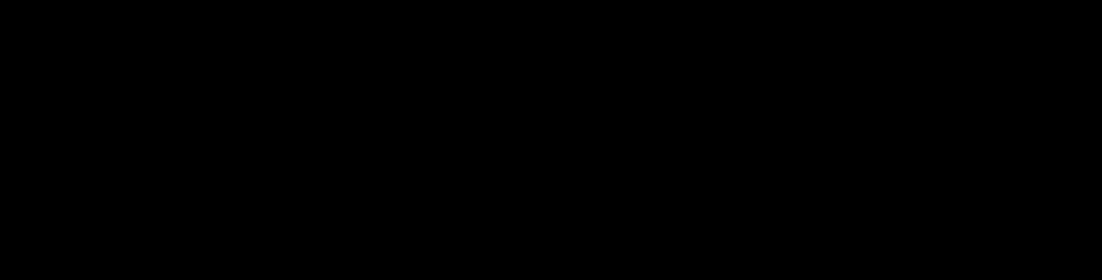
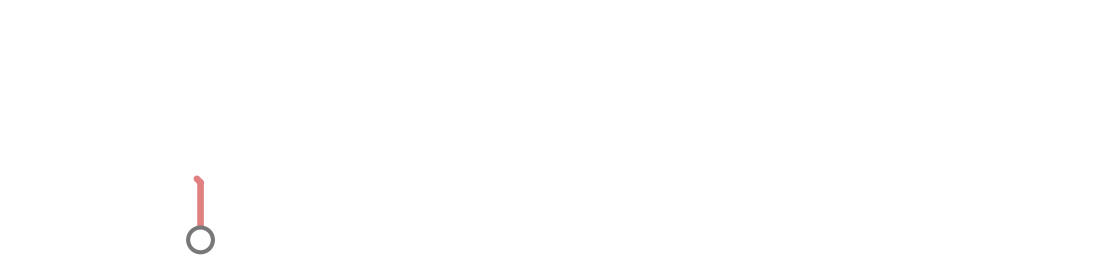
track: none -> (196, 178) (200, 182) (200, 239)
via: none -> (200, 239)

